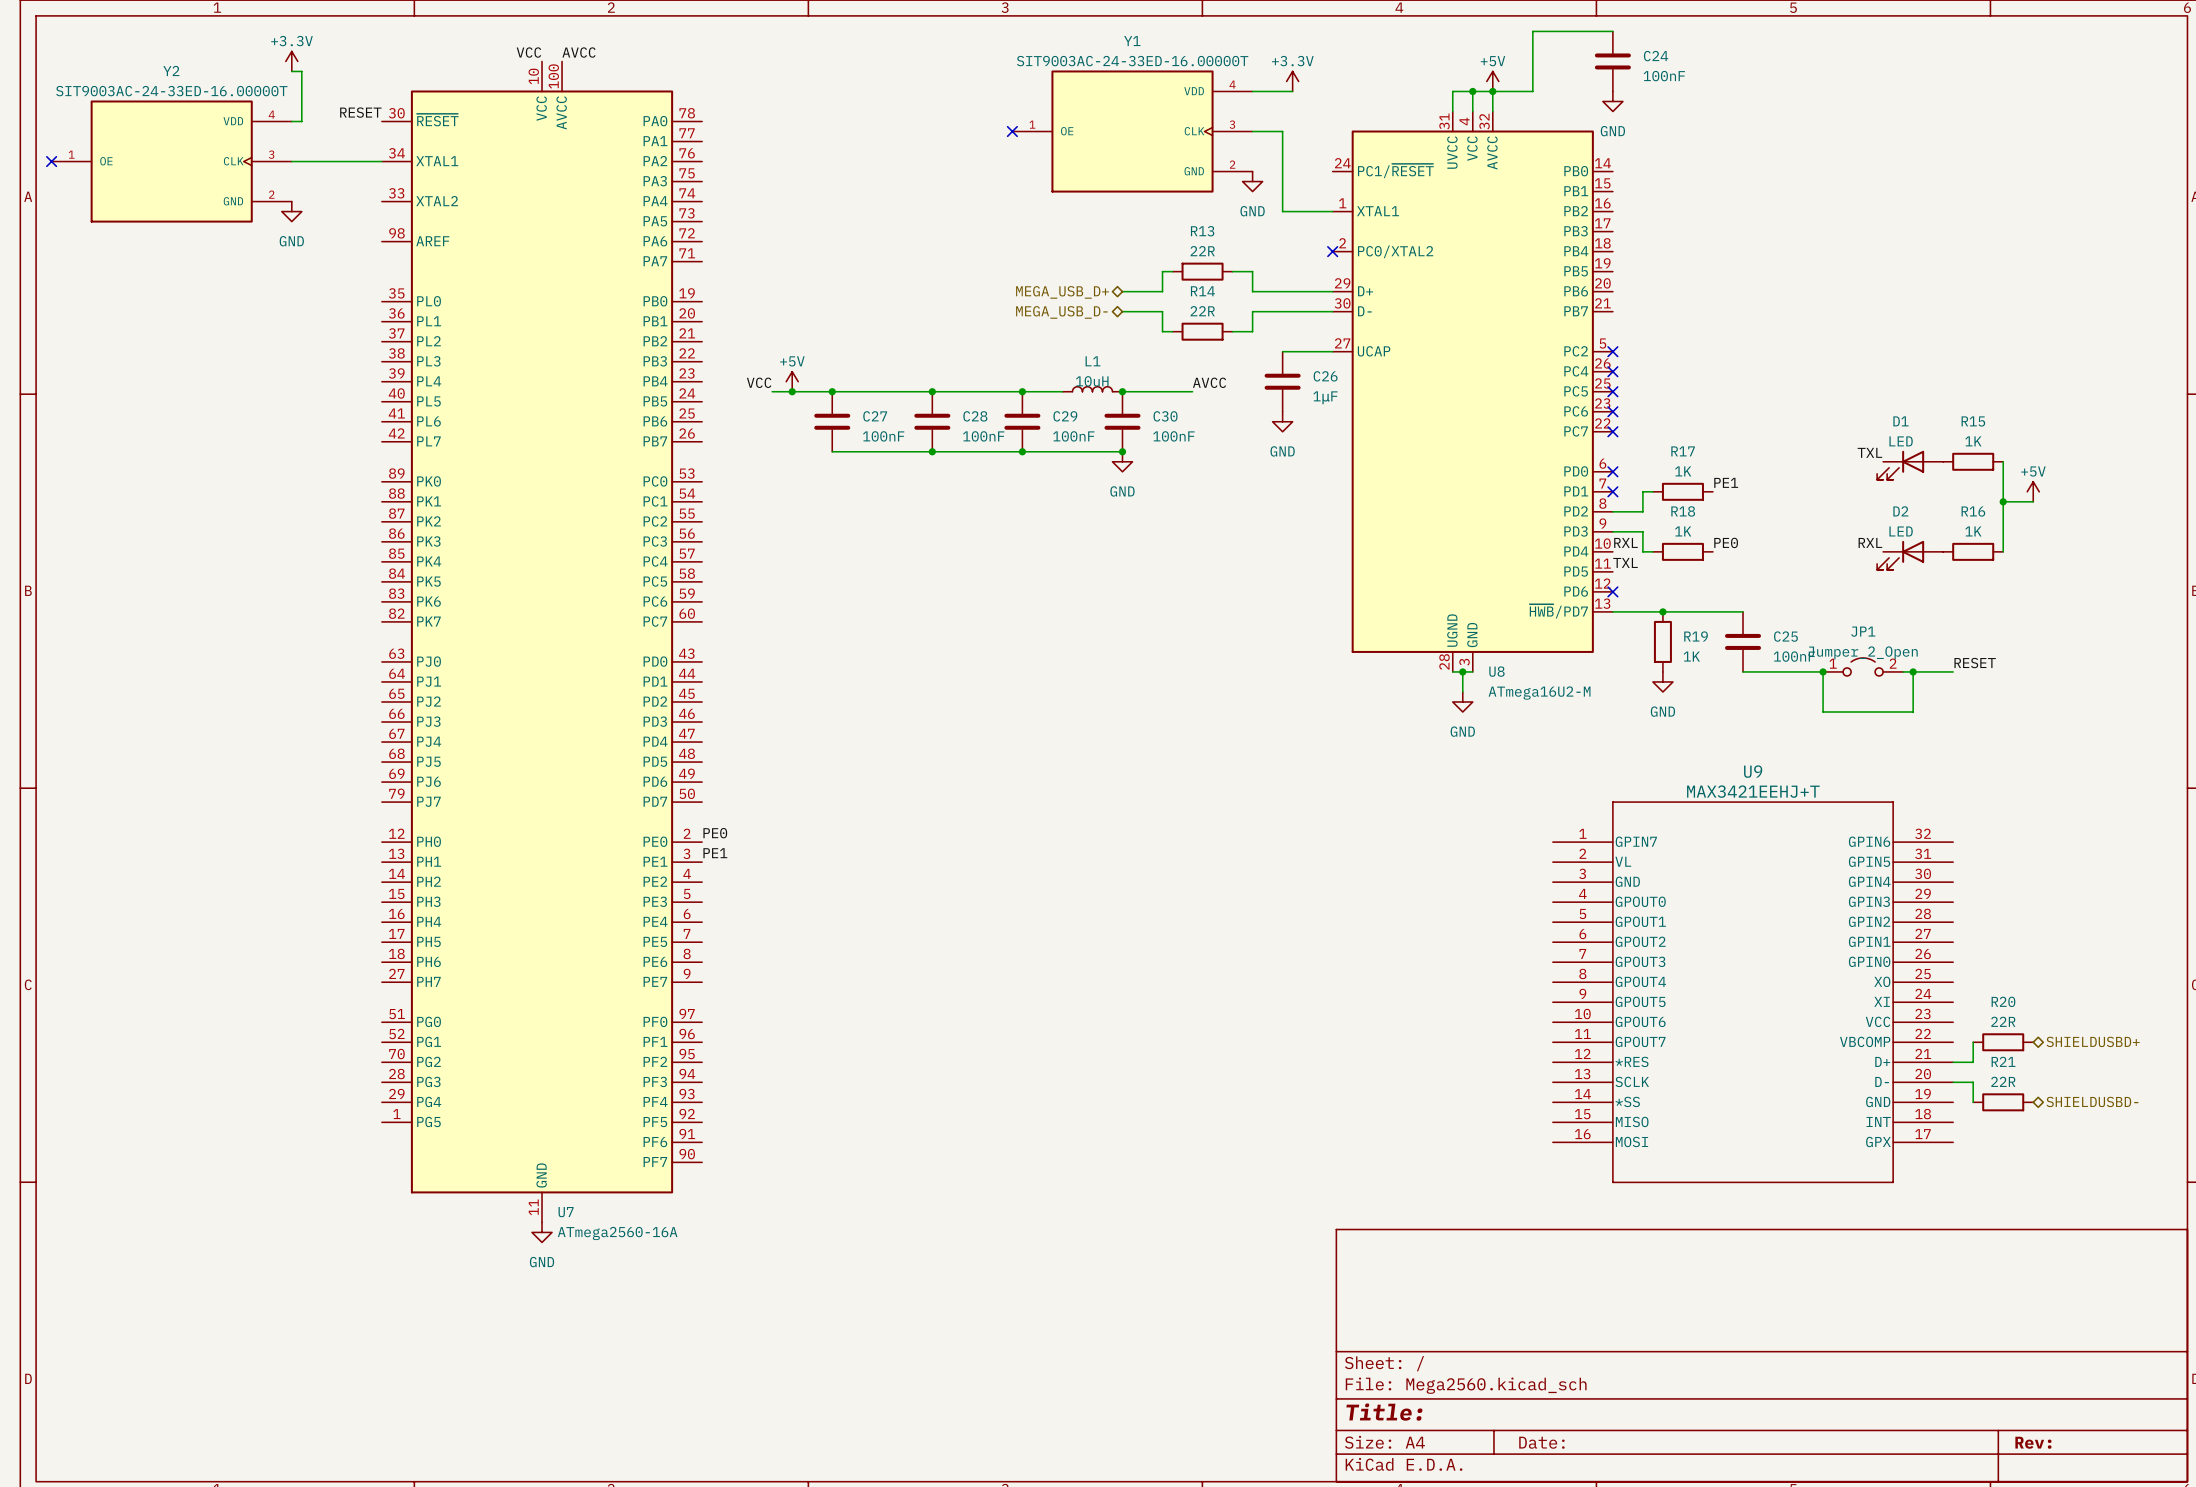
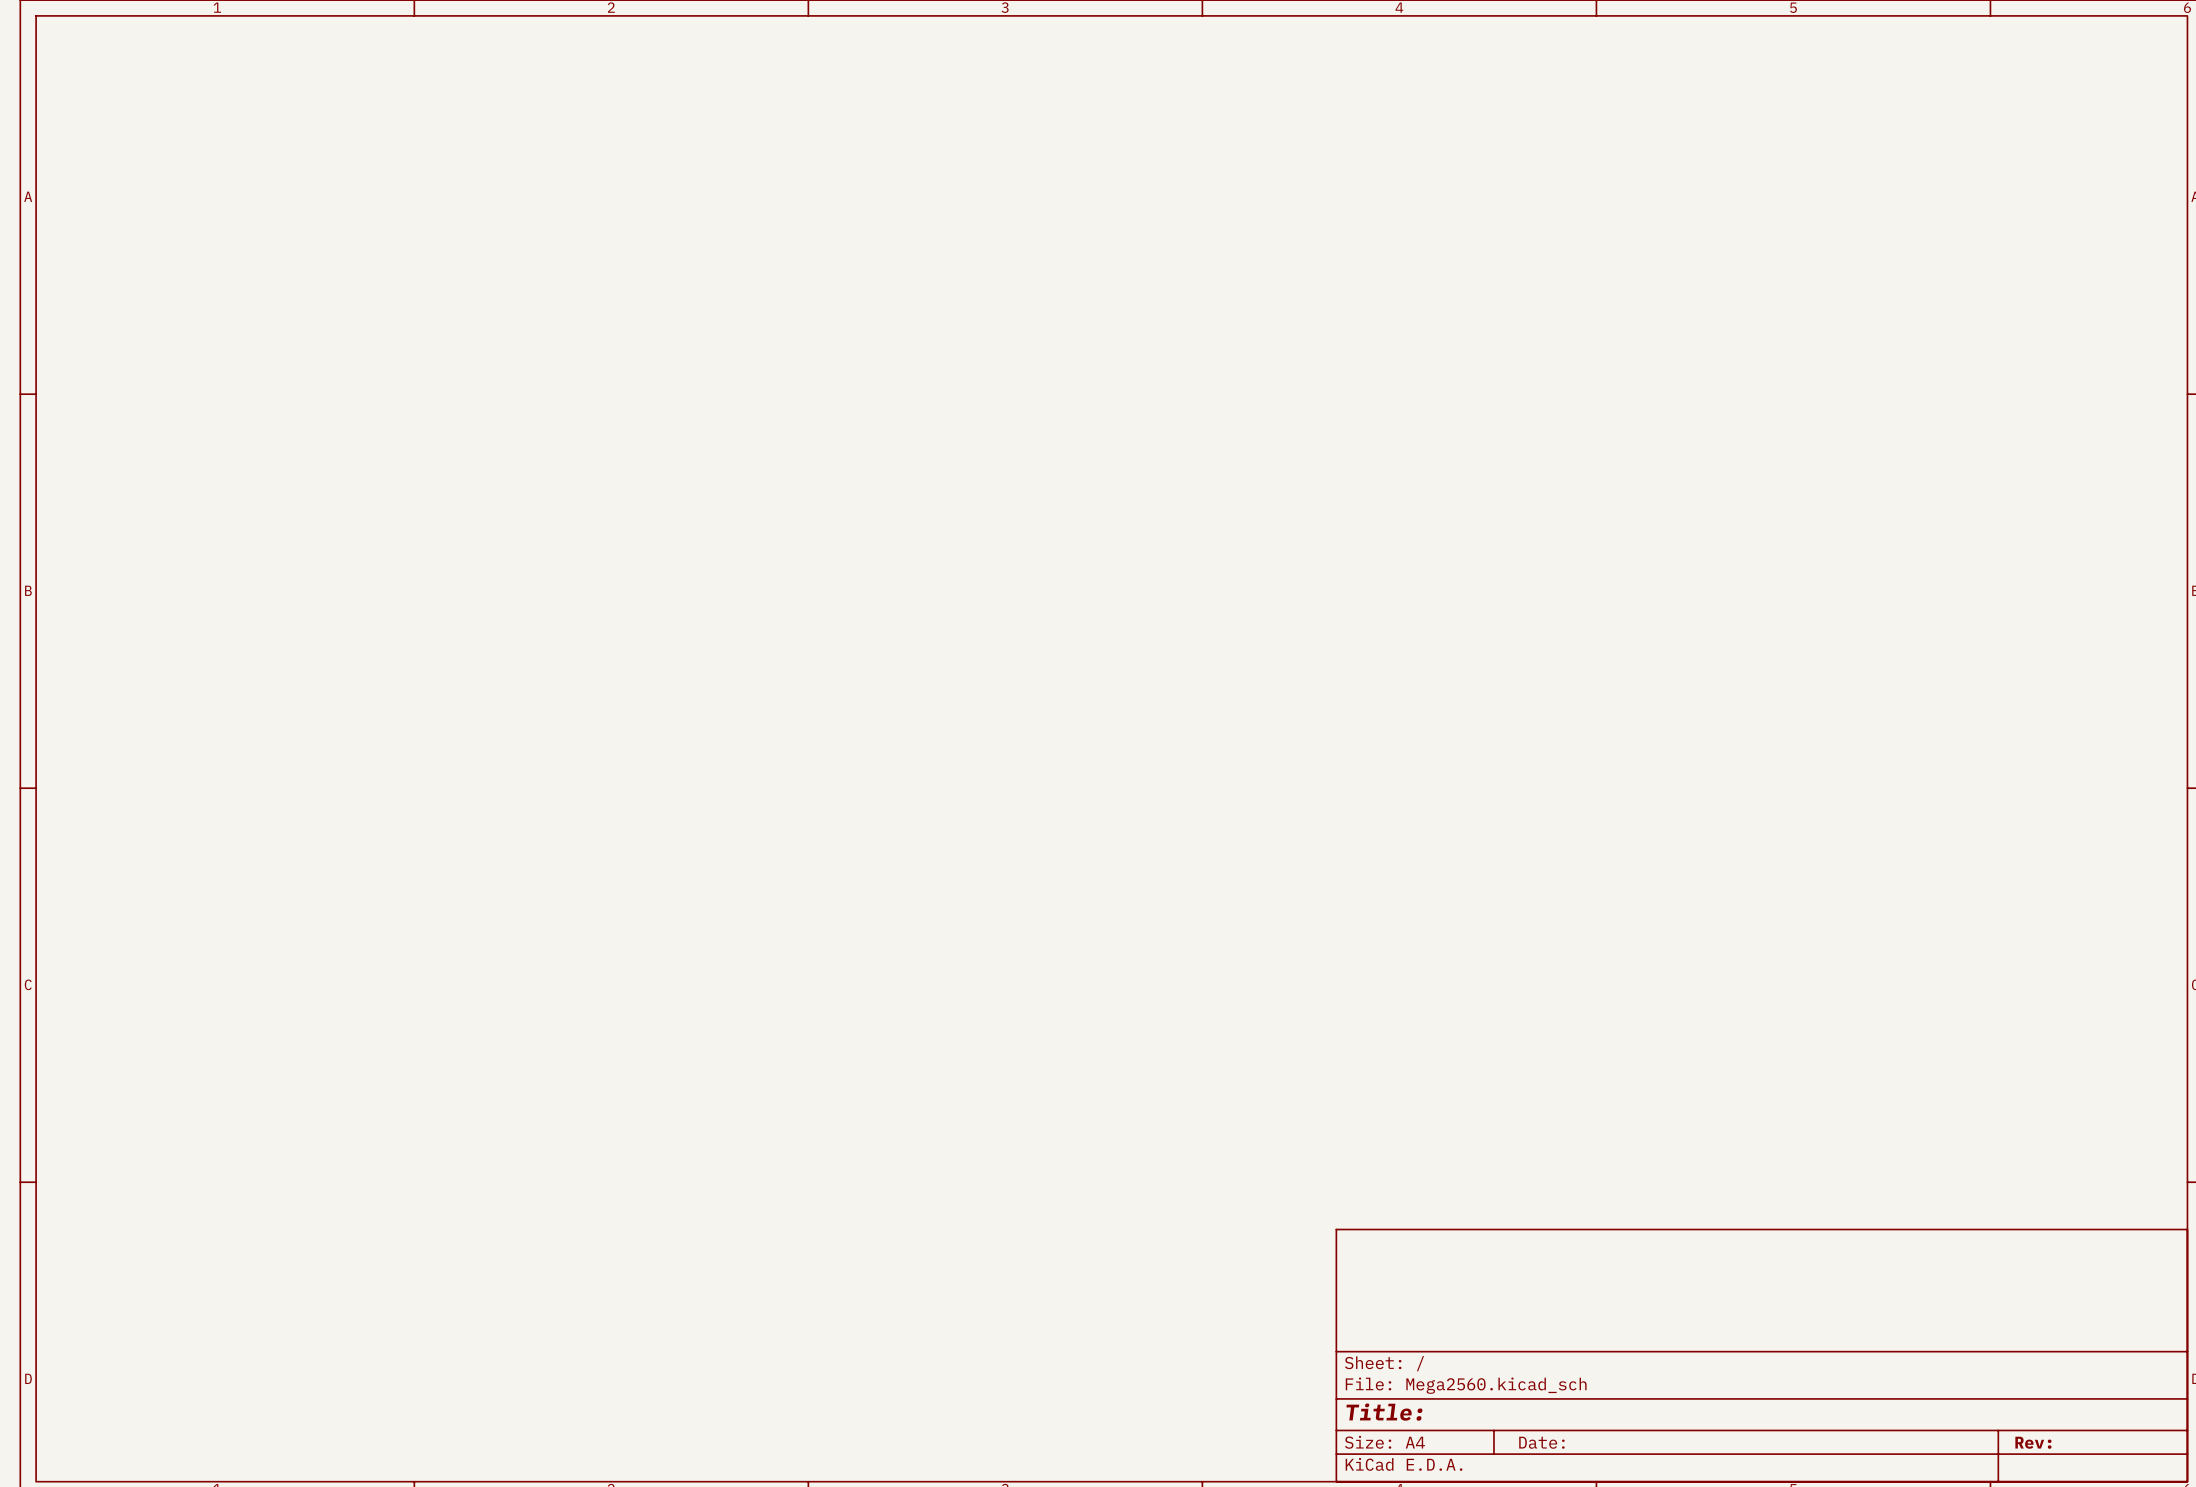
wire: (1612, 31) (1532, 31) (1532, 91) (1452, 91) (1452, 111) -> none
label: VCC (528, 52) -> none
label: AVCC (579, 52) -> none
power symbol: +3.3V (291, 61) -> none
C24: 100nF (1612, 61) -> none
wire: (291, 71) (301, 71) (301, 121) (291, 121) -> none
power symbol: +3.3V (1292, 81) -> none
power symbol: +5V (1492, 81) -> none
wire: (1252, 91) (1292, 91) -> none
wire: (1472, 91) (1472, 111) -> none
junction: (1472, 91) -> none
wire: (1492, 91) (1492, 111) -> none
junction: (1492, 91) -> none
power symbol: GND (1612, 101) -> none
label: RESET (360, 112) -> none
no-connect mark: (1012, 131) -> none
Y1: SIT9003AC-24-33ED-16.00000T (1132, 131) -> none
wire: (1252, 131) (1282, 131) (1282, 211) (1332, 211) -> none
no-connect mark: (51, 161) -> none
Y2: SIT9003AC-24-33ED-16.00000T (171, 161) -> none
wire: (291, 161) (381, 161) -> none
power symbol: GND (1252, 181) -> none
power symbol: GND (291, 211) -> none
no-connect mark: (1332, 251) -> none
wire: (1172, 271) (1162, 271) (1162, 291) (1122, 291) -> none
R13: 22R (1202, 271) -> none
wire: (1232, 271) (1252, 271) (1252, 291) (1332, 291) -> none
hierarchical label: MEGA_USB_D+ (1062, 292) -> none
wire: (1122, 311) (1162, 311) (1162, 331) (1172, 331) -> none
wire: (1332, 311) (1252, 311) (1252, 331) (1232, 331) -> none
hierarchical label: MEGA_USB_D- (1061, 312) -> none
R14: 22R (1202, 331) -> none
wire: (1282, 351) (1332, 351) -> none
no-connect mark: (1612, 351) -> none
no-connect mark: (1612, 371) -> none
power symbol: +5V (792, 381) -> none
C26: 1μF (1282, 381) -> none
label: VCC (759, 382) -> none
label: AVCC (1209, 382) -> none
L1: 10uH (1092, 389) -> none
wire: (772, 391) (1062, 391) -> none
junction: (792, 391) -> none
junction: (832, 391) -> none
junction: (932, 391) -> none
junction: (1022, 391) -> none
wire: (1122, 391) (1192, 391) -> none
junction: (1122, 391) -> none
U8: ATmega16U2-M (1472, 391) -> none
no-connect mark: (1612, 391) -> none
no-connect mark: (1612, 411) -> none
C27: 100nF (832, 421) -> none
C28: 100nF (932, 421) -> none
C29: 100nF (1022, 421) -> none
C30: 100nF (1122, 421) -> none
power symbol: GND (1282, 421) -> none
no-connect mark: (1612, 431) -> none
wire: (832, 451) (1122, 451) -> none
junction: (932, 451) -> none
junction: (1022, 451) -> none
junction: (1122, 451) -> none
label: TXL (1869, 452) -> none
power symbol: GND (1122, 461) -> none
R15: 1K (1973, 461) -> none
wire: (2003, 461) (2003, 551) -> none
D1: LED (1910, 465) -> none
no-connect mark: (1612, 471) -> none
label: PE1 (1726, 482) -> none
no-connect mark: (1612, 491) -> none
wire: (1652, 491) (1642, 491) (1642, 511) (1612, 511) -> none
R17: 1K (1682, 491) -> none
power symbol: +5V (2033, 491) -> none
wire: (2003, 501) (2033, 501) -> none
junction: (2003, 501) -> none
wire: (1612, 531) (1642, 531) (1642, 551) (1652, 551) -> none
label: RXL (1625, 542) -> none
label: PE0 (1726, 542) -> none
label: RXL (1870, 542) -> none
R18: 1K (1682, 551) -> none
R16: 1K (1973, 551) -> none
D2: LED (1910, 555) -> none
label: TXL (1625, 562) -> none
no-connect mark: (1612, 591) -> none
wire: (1612, 611) (1743, 611) -> none
junction: (1662, 611) -> none
U7: ATmega2560-16A (542, 641) -> none
R19: 1K (1662, 641) -> none
C25: 100nF (1743, 641) -> none
label: RESET (1975, 663) -> none
JP1: Jumper_2_Open (1863, 666) -> none
wire: (1452, 671) (1472, 671) -> none
wire: (1462, 671) (1462, 691) -> none
junction: (1462, 671) -> none
wire: (1743, 671) (1823, 671) (1823, 712) (1913, 712) (1913, 671) -> none
junction: (1823, 671) -> none
wire: (1903, 671) (1953, 671) -> none
junction: (1913, 671) -> none
power symbol: GND (1662, 681) -> none
power symbol: GND (1462, 701) -> none
label: PE0 (715, 833) -> none
label: PE1 (715, 853) -> none
U9: MAX3421EEHJ+T (1753, 992) -> none
hierarchical label: SHIELDUSBD+ (2093, 1041) -> none
wire: (1973, 1042) (1973, 1062) (1953, 1062) -> none
R20: 22R (2003, 1042) -> none
wire: (1953, 1082) (1973, 1082) (1973, 1102) -> none
hierarchical label: SHIELDUSBD- (2092, 1101) -> none
R21: 22R (2003, 1102) -> none
power symbol: GND (542, 1232) -> none

